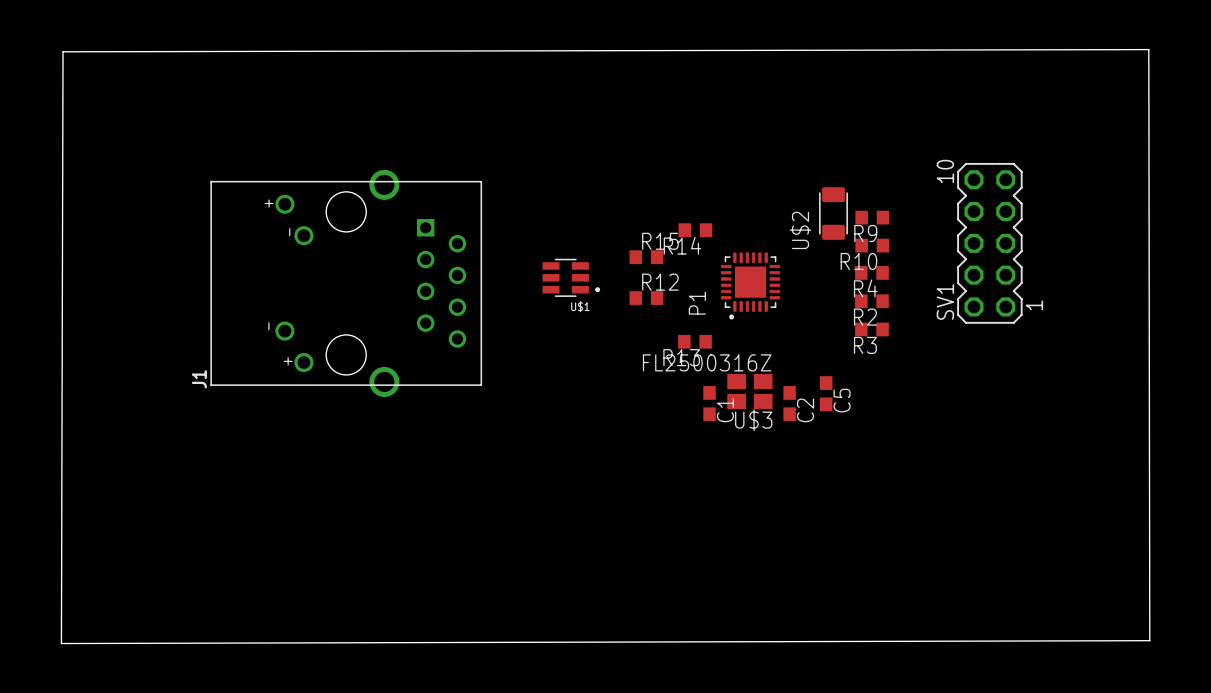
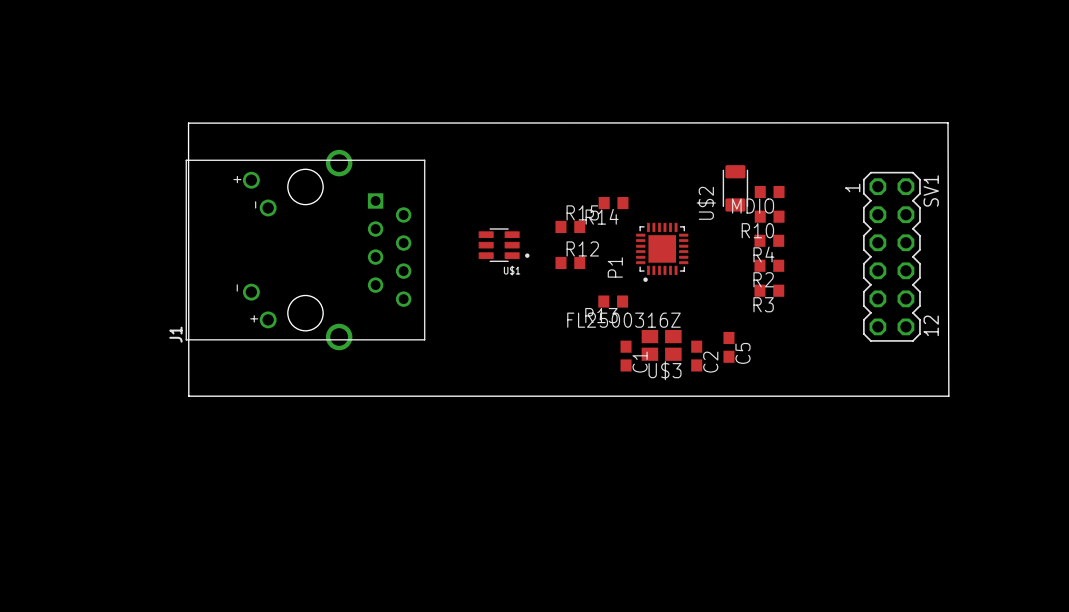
board edge: (1148, 49) (1149, 640) (61, 643) (63, 51) (1148, 49) -> none
board edge: none -> (948, 122) (948, 396) (188, 396) (188, 123) (948, 122)
SV1 footprint: [957, 162, 1023, 324] -> [863, 171, 921, 342]
R9 name: R9 (865, 233) -> MDIO (753, 206)
SV1 name position: SV1 (945, 302) -> SV1 (931, 191)

